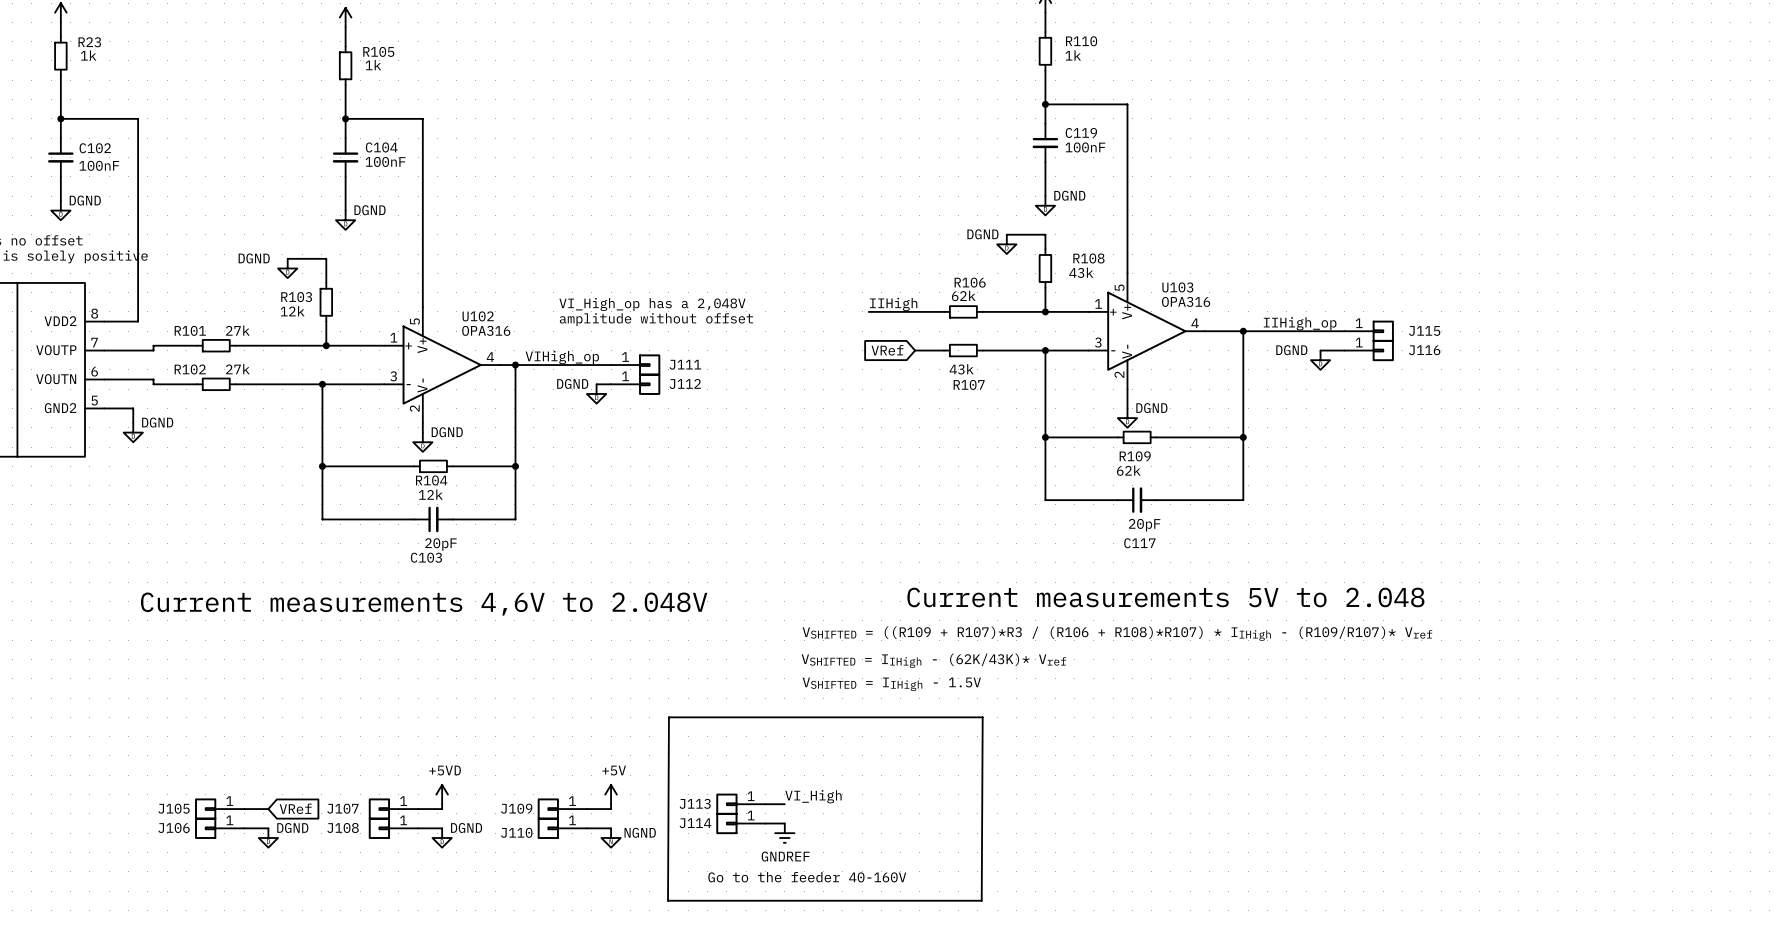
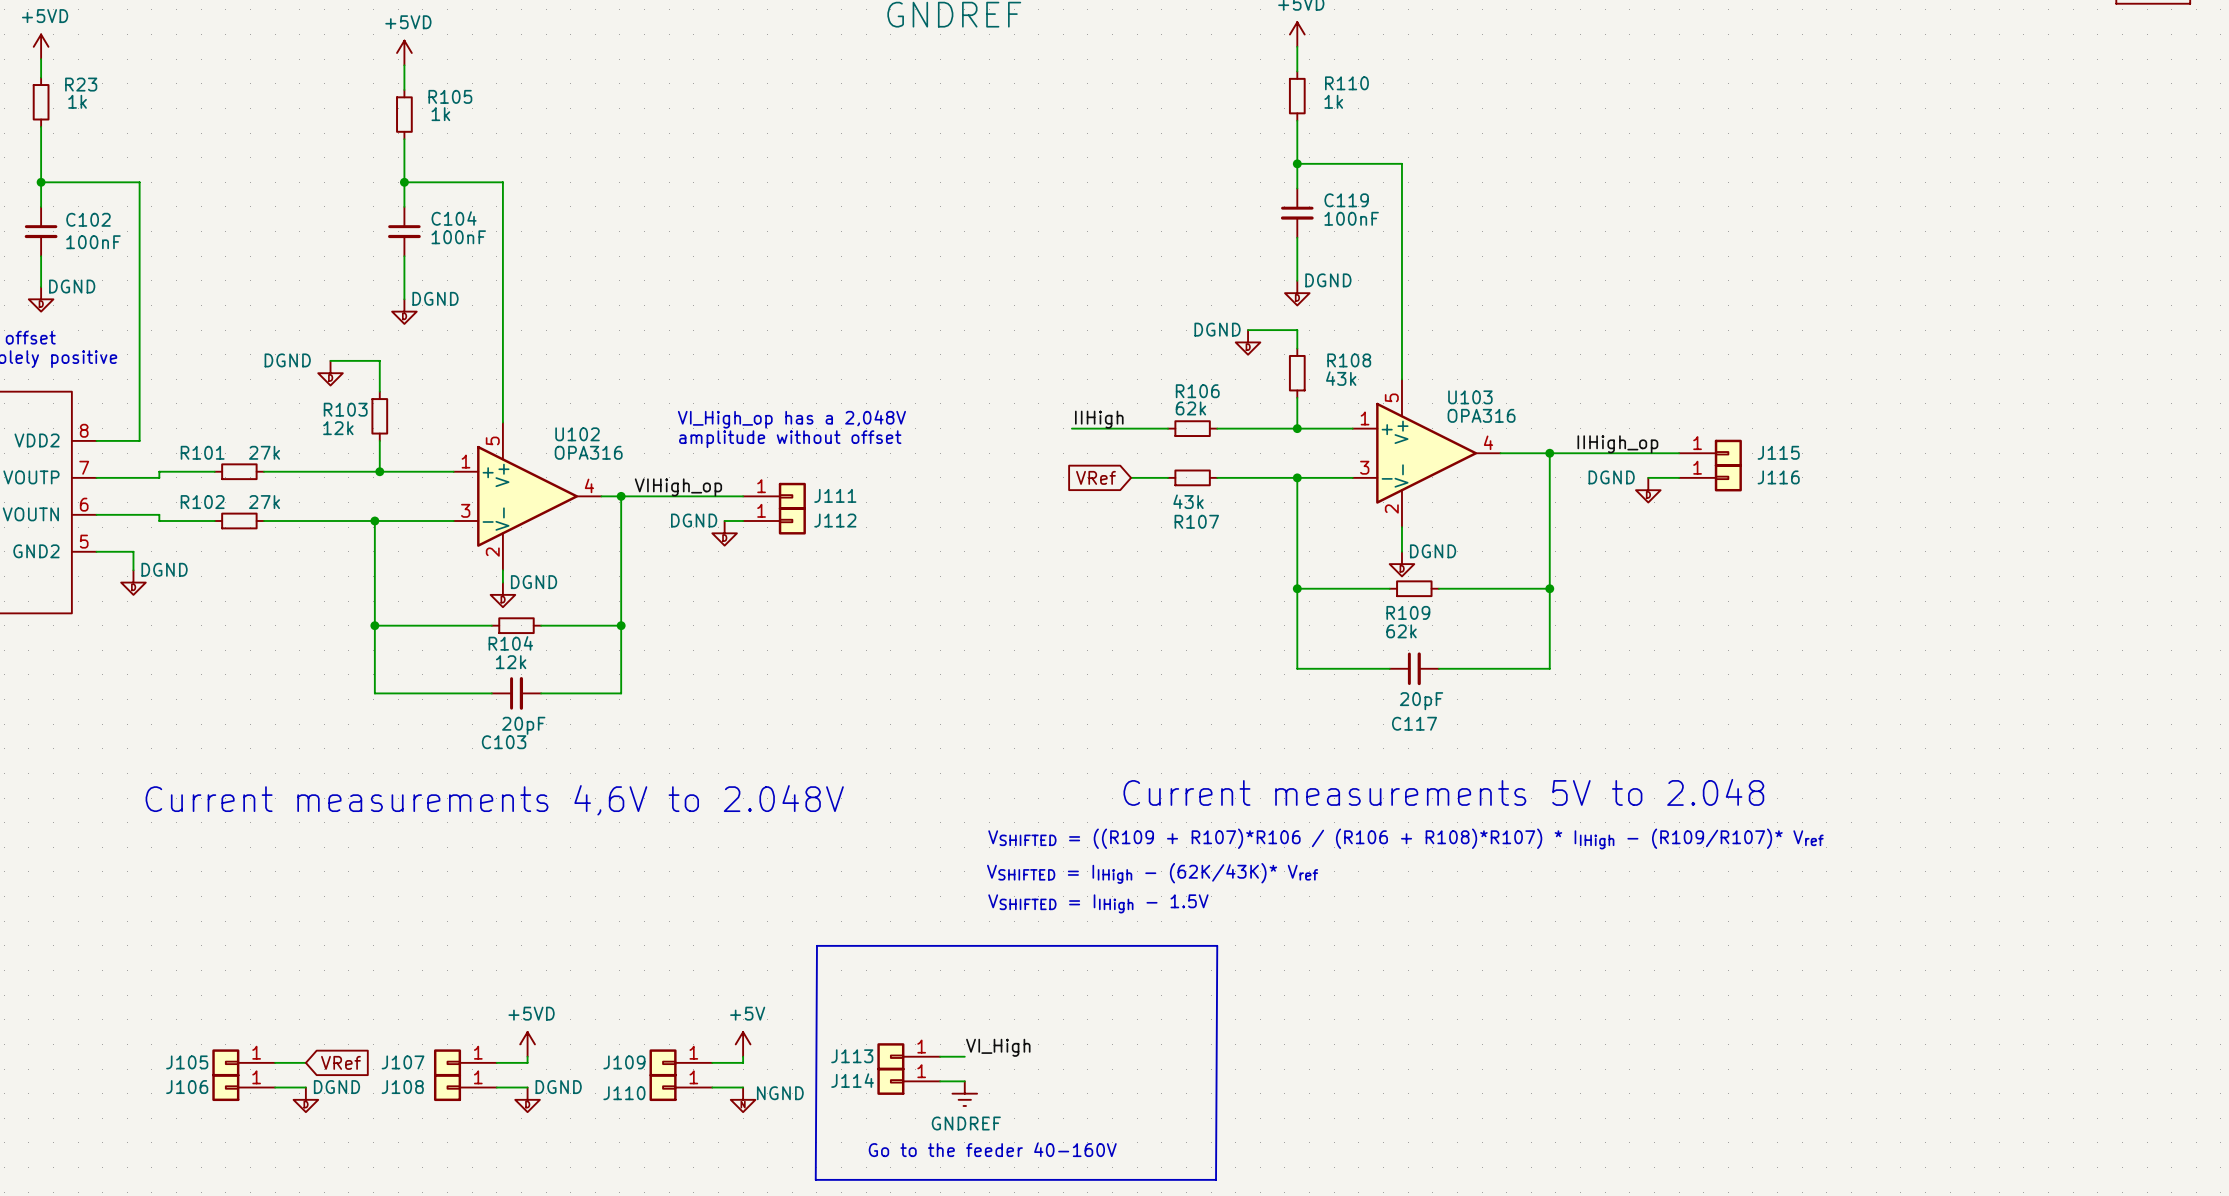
text: VSHIFTED = ((R109 + R107)*R3 / (R106 + R108)*R107) * IIHigh - (R109/R107)* Vref (1117, 633) -> VSHIFTED = ((R109 + R107)*R106 / (R106 + R108)*R107) * IIHigh - (R109/R107)* Vref (1405, 838)

